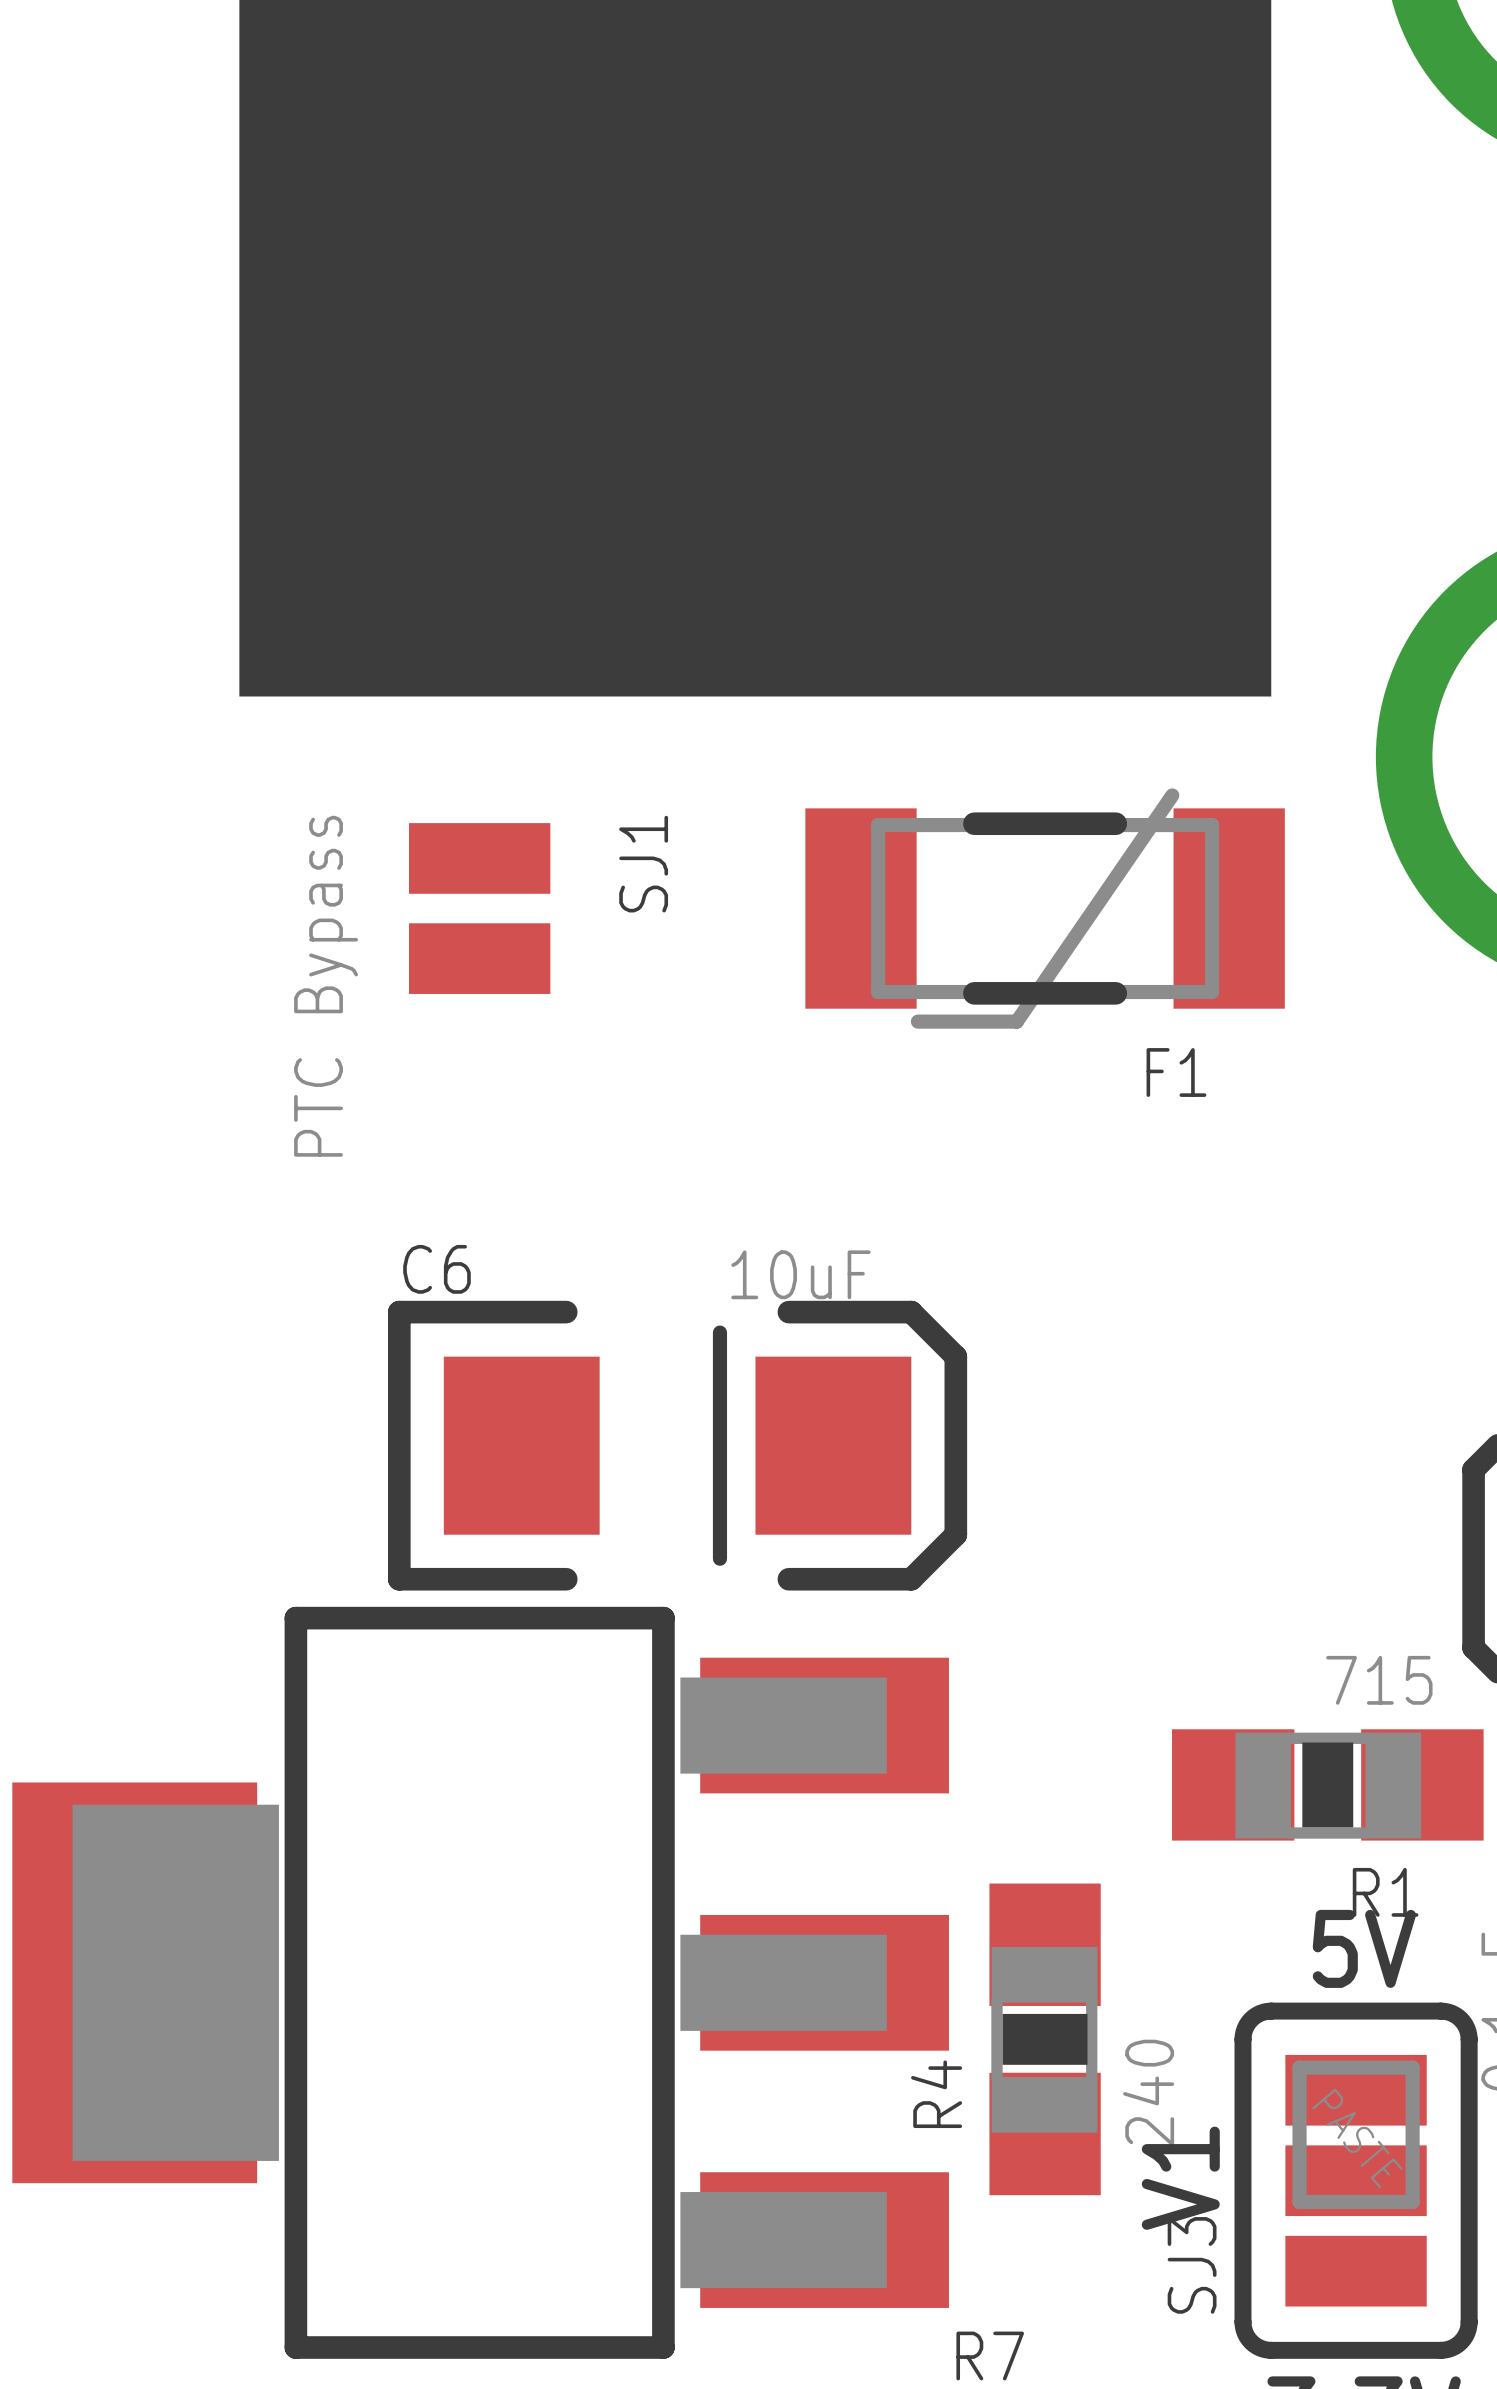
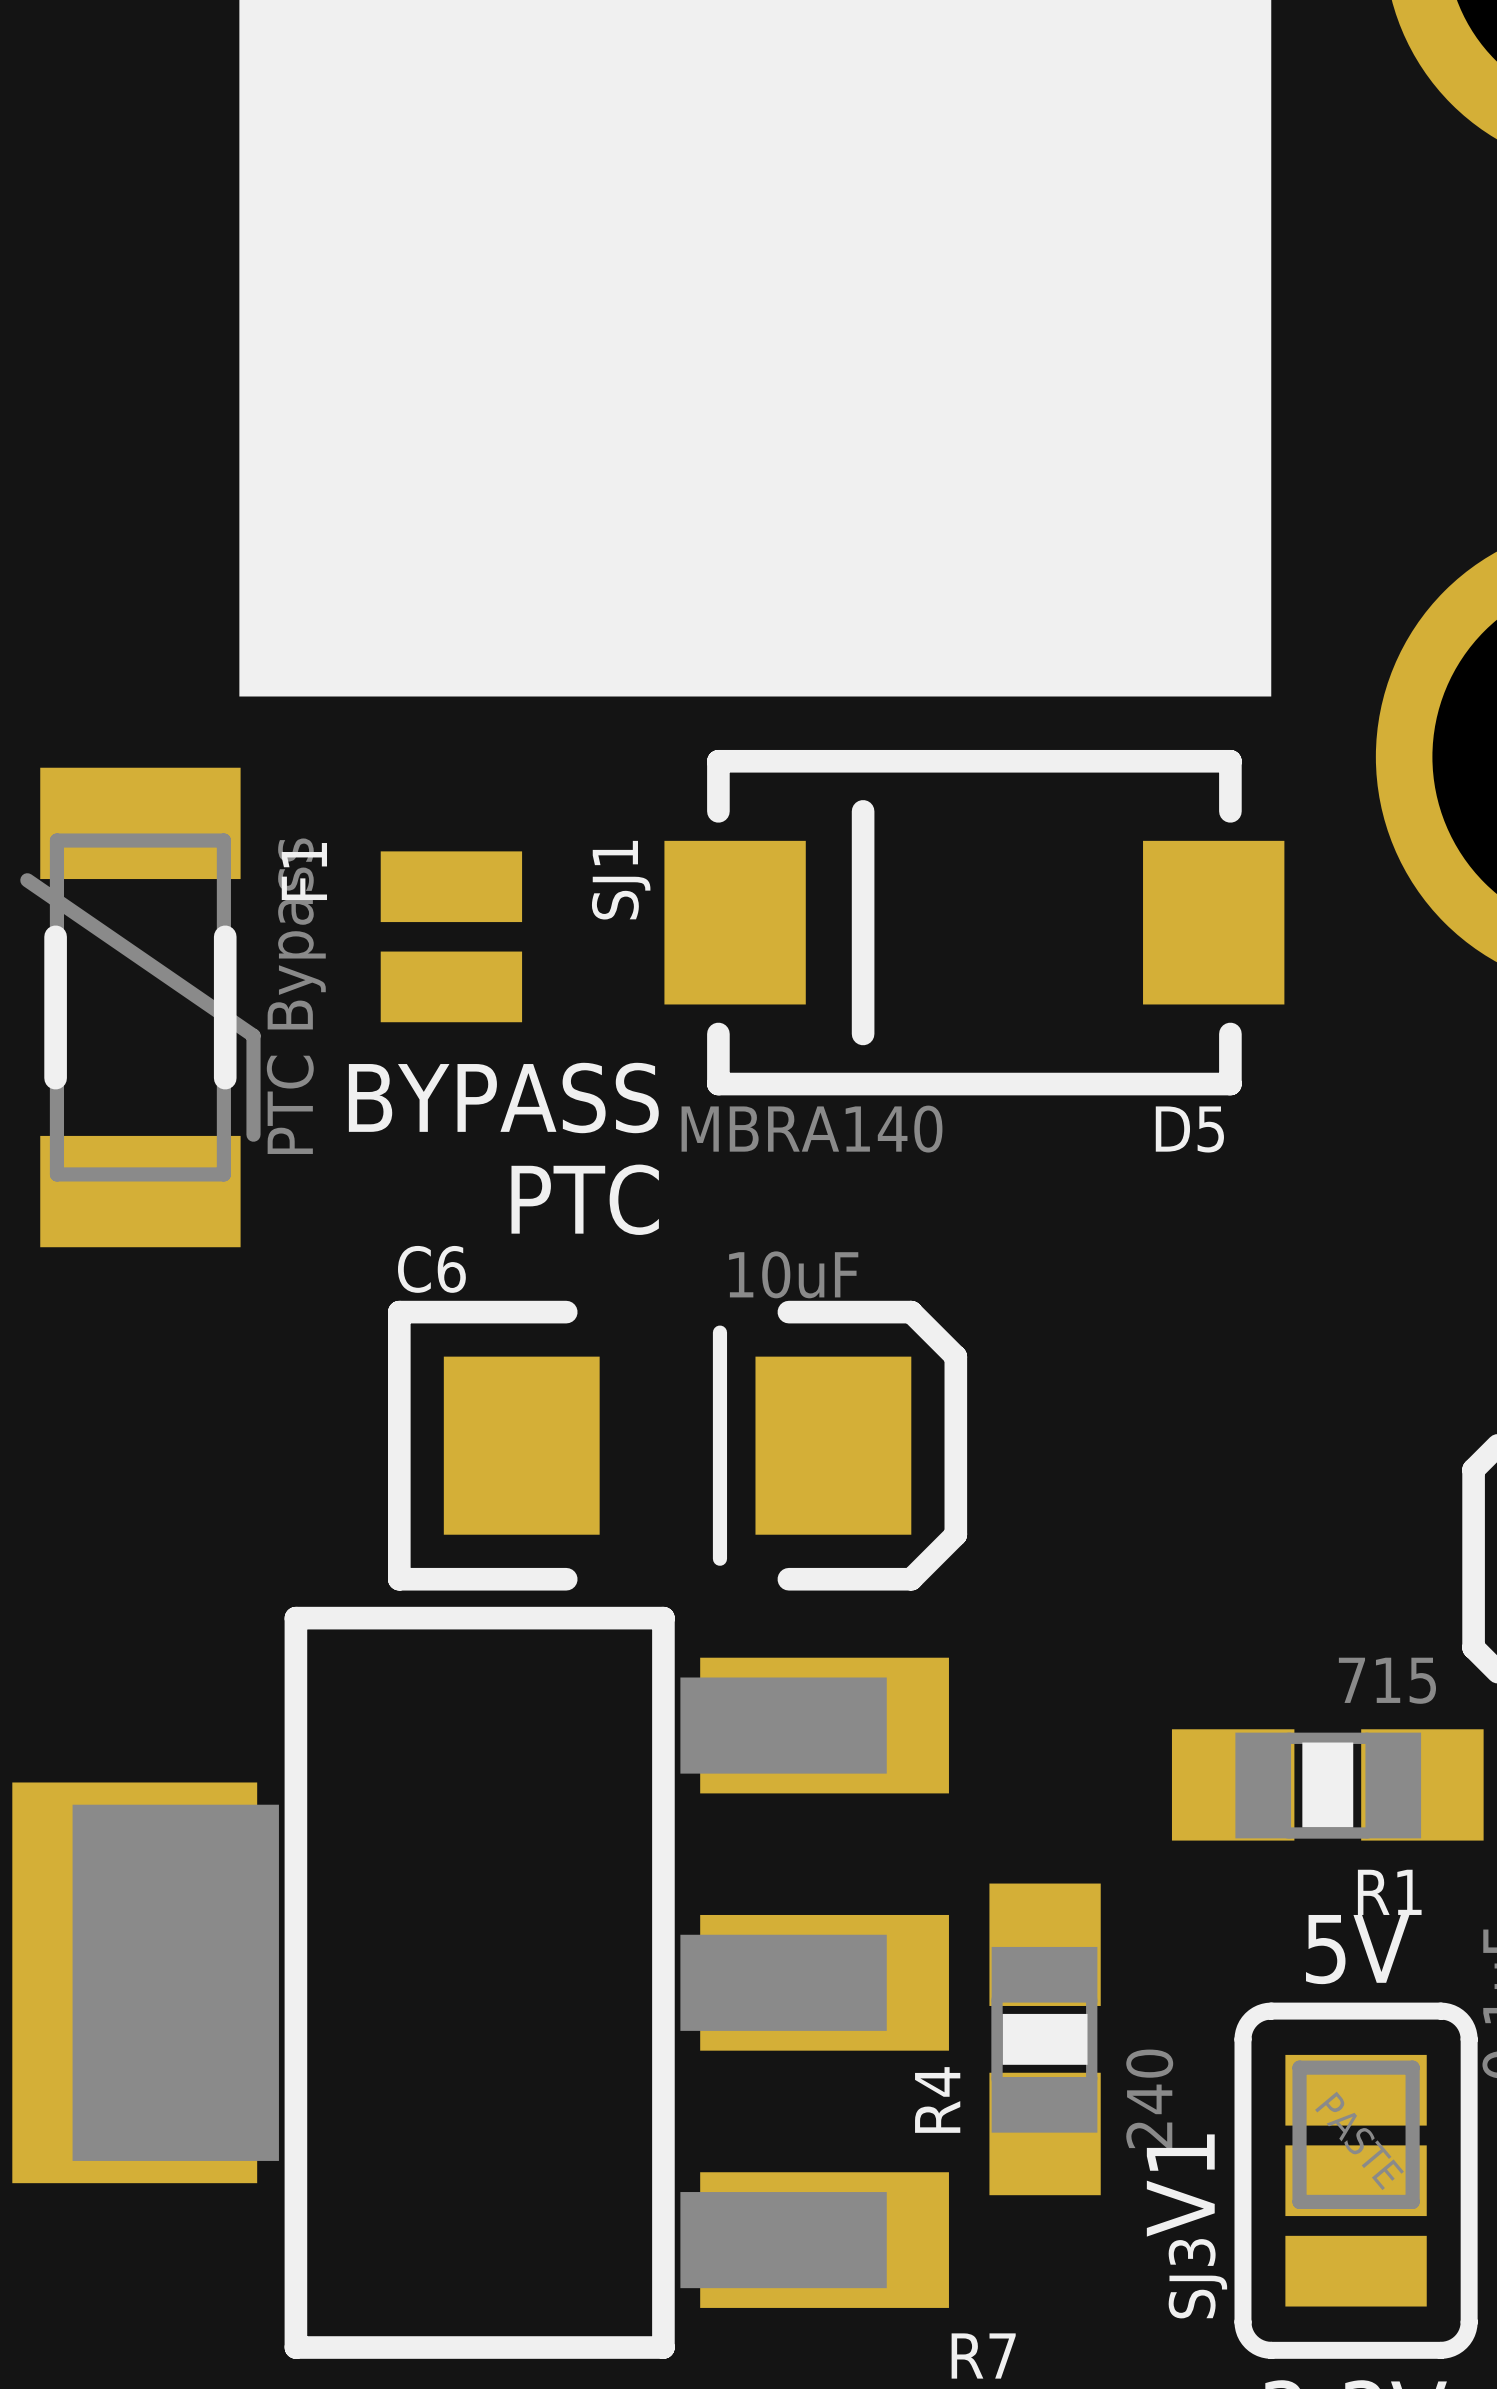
SJ1 position: (479, 908) -> (451, 936)
F1 rotation: 0° (1045, 908) -> 90° counterclockwise (140, 1007)
F1 position: (1045, 908) -> (140, 1007)
D5: none -> MBRA140 (974, 922)
text: none -> BYPASS (503, 1098)
text: none -> PTC (585, 1199)

